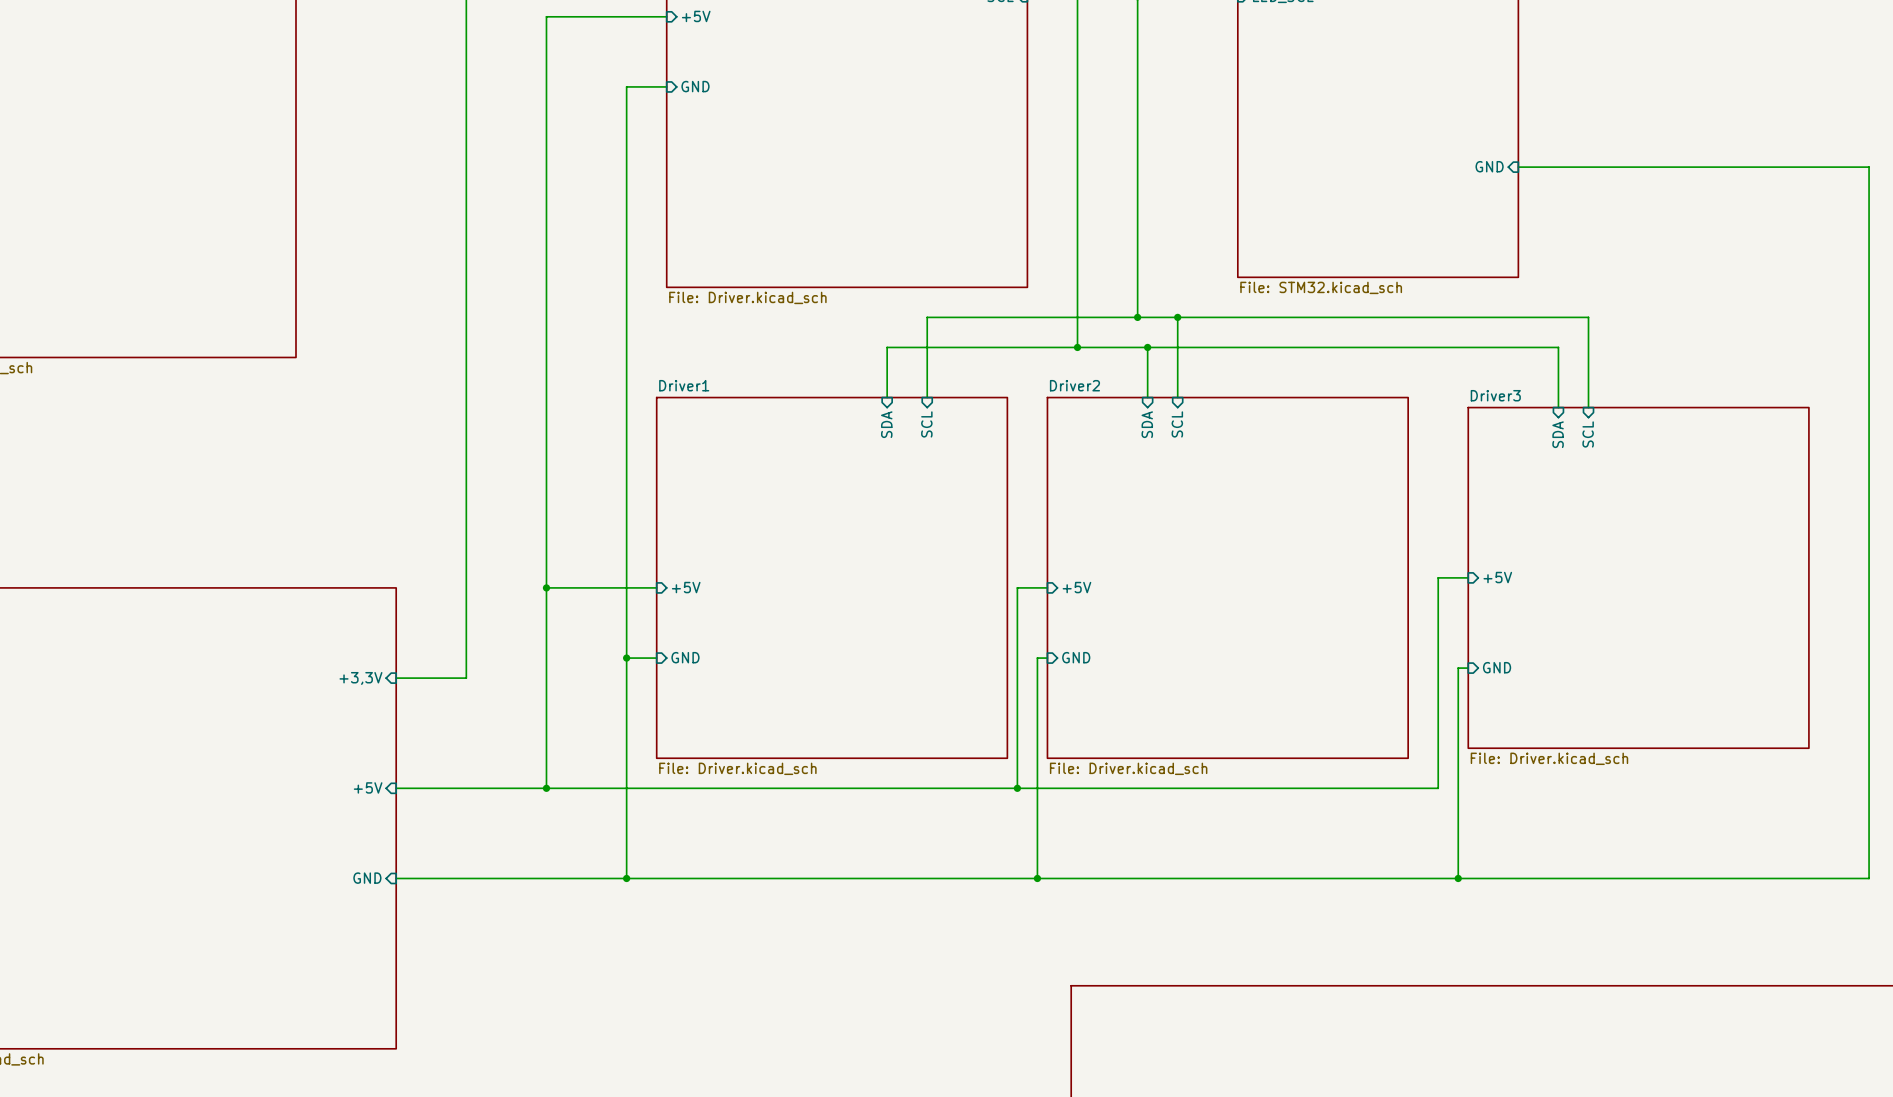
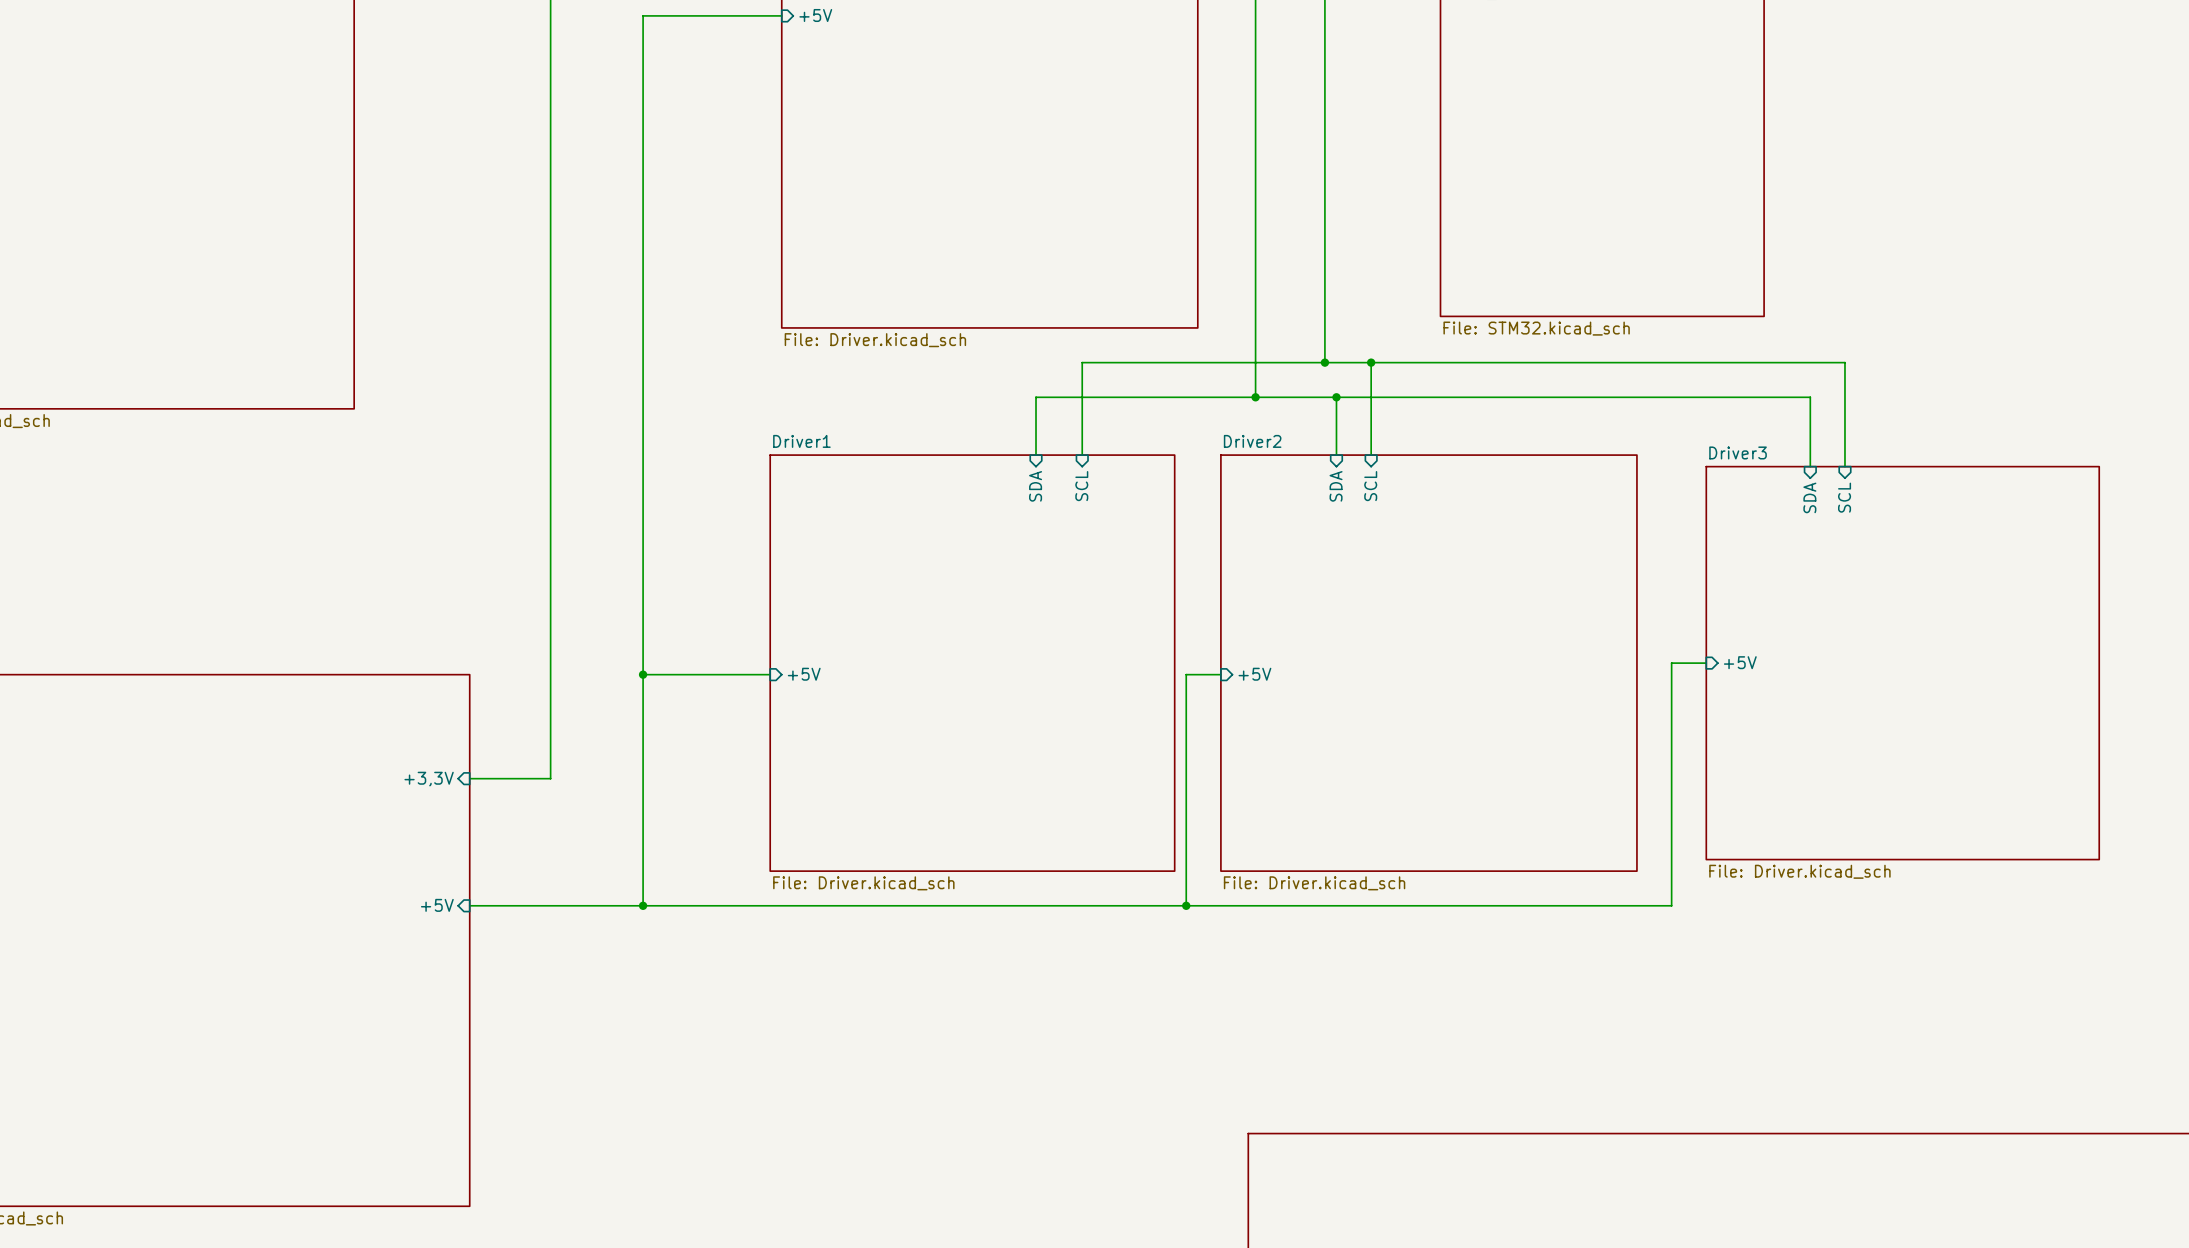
wire: (666, 86) (626, 86) (626, 878) -> none
sheet pin: GND (695, 86) -> none
sheet pin: GND (1489, 166) -> none
wire: (1518, 167) (1869, 167) (1869, 878) (396, 878) -> none
sheet pin: GND (685, 657) -> none
sheet pin: GND (1076, 657) -> none
wire: (626, 658) (656, 658) -> none
junction: (626, 658) -> none
wire: (1047, 658) (1037, 658) (1037, 878) -> none
sheet pin: GND (1497, 667) -> none
wire: (1468, 668) (1458, 668) (1458, 878) -> none
sheet pin: GND (367, 878) -> none
junction: (626, 878) -> none
junction: (1037, 878) -> none
junction: (1458, 878) -> none

